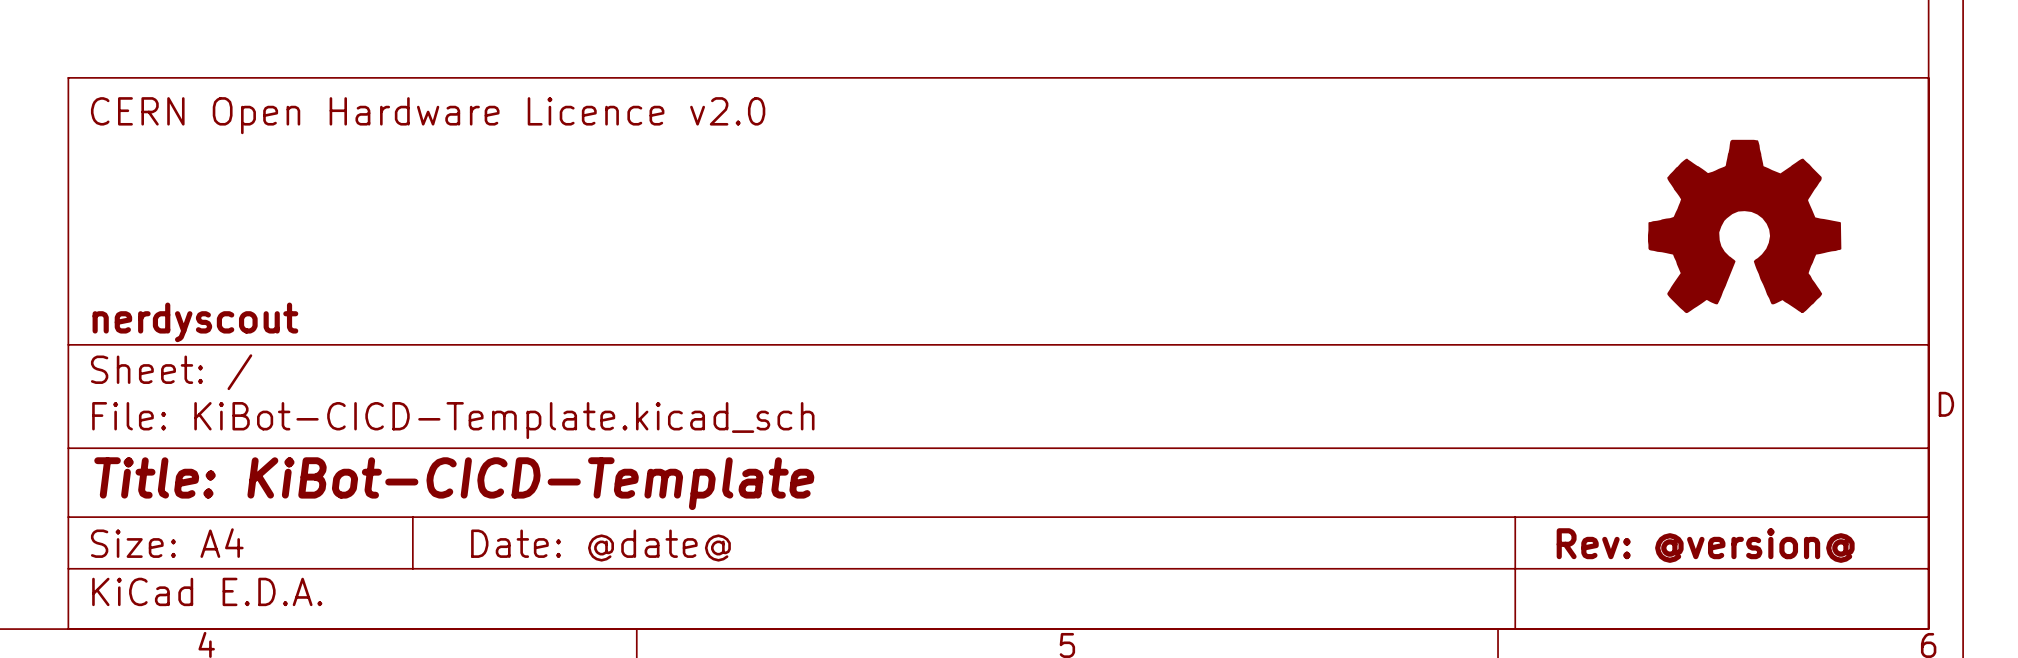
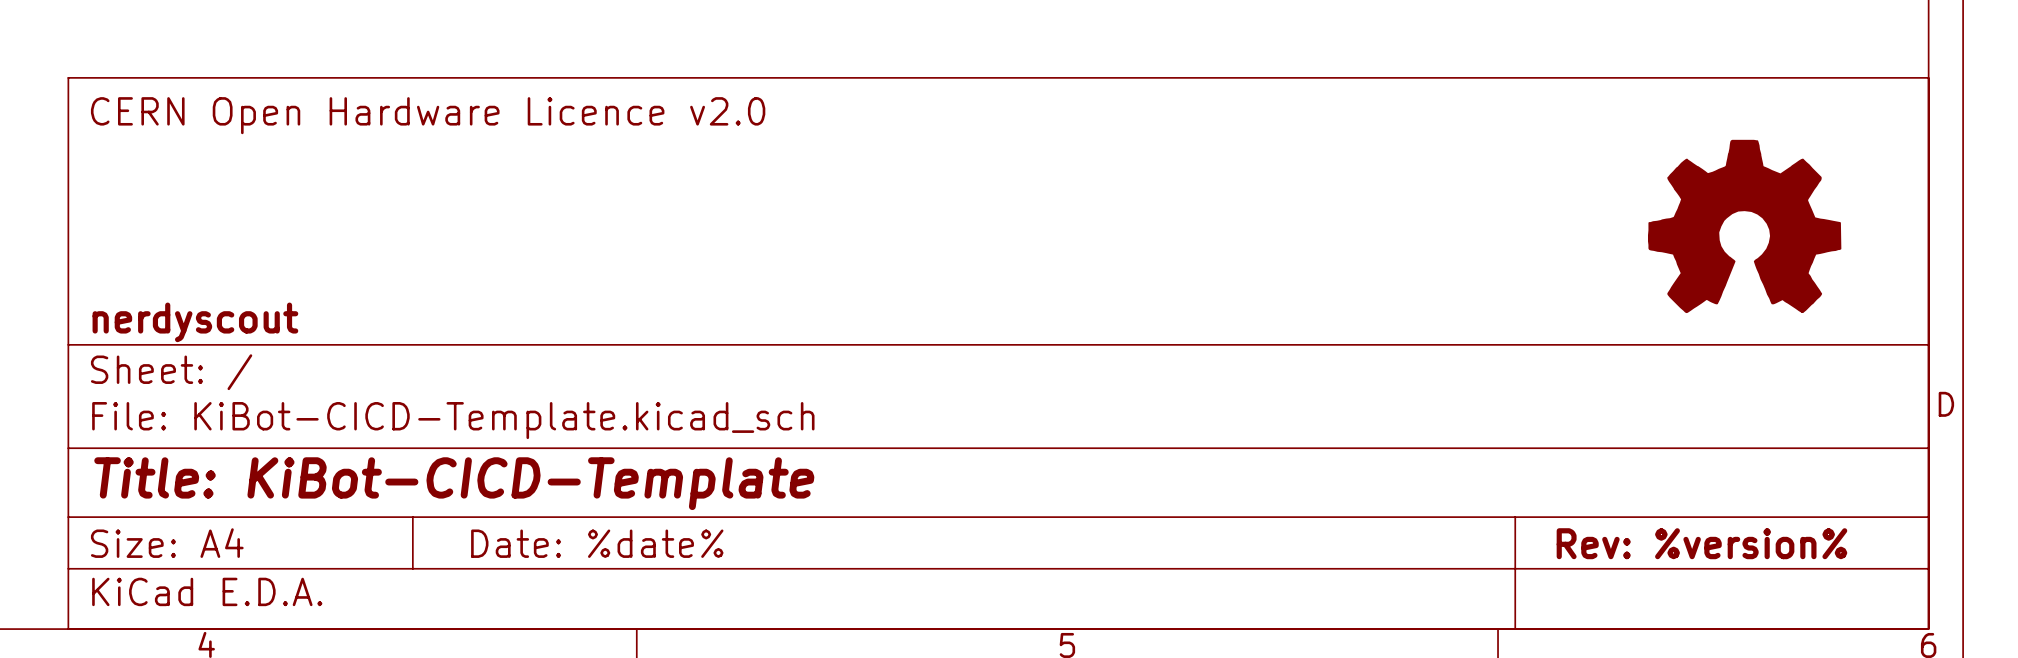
title block: Date: @date@ (600, 545) -> Date: %date% (597, 543)
title block: Rev: @version@ (1705, 545) -> Rev: %version% (1701, 543)

